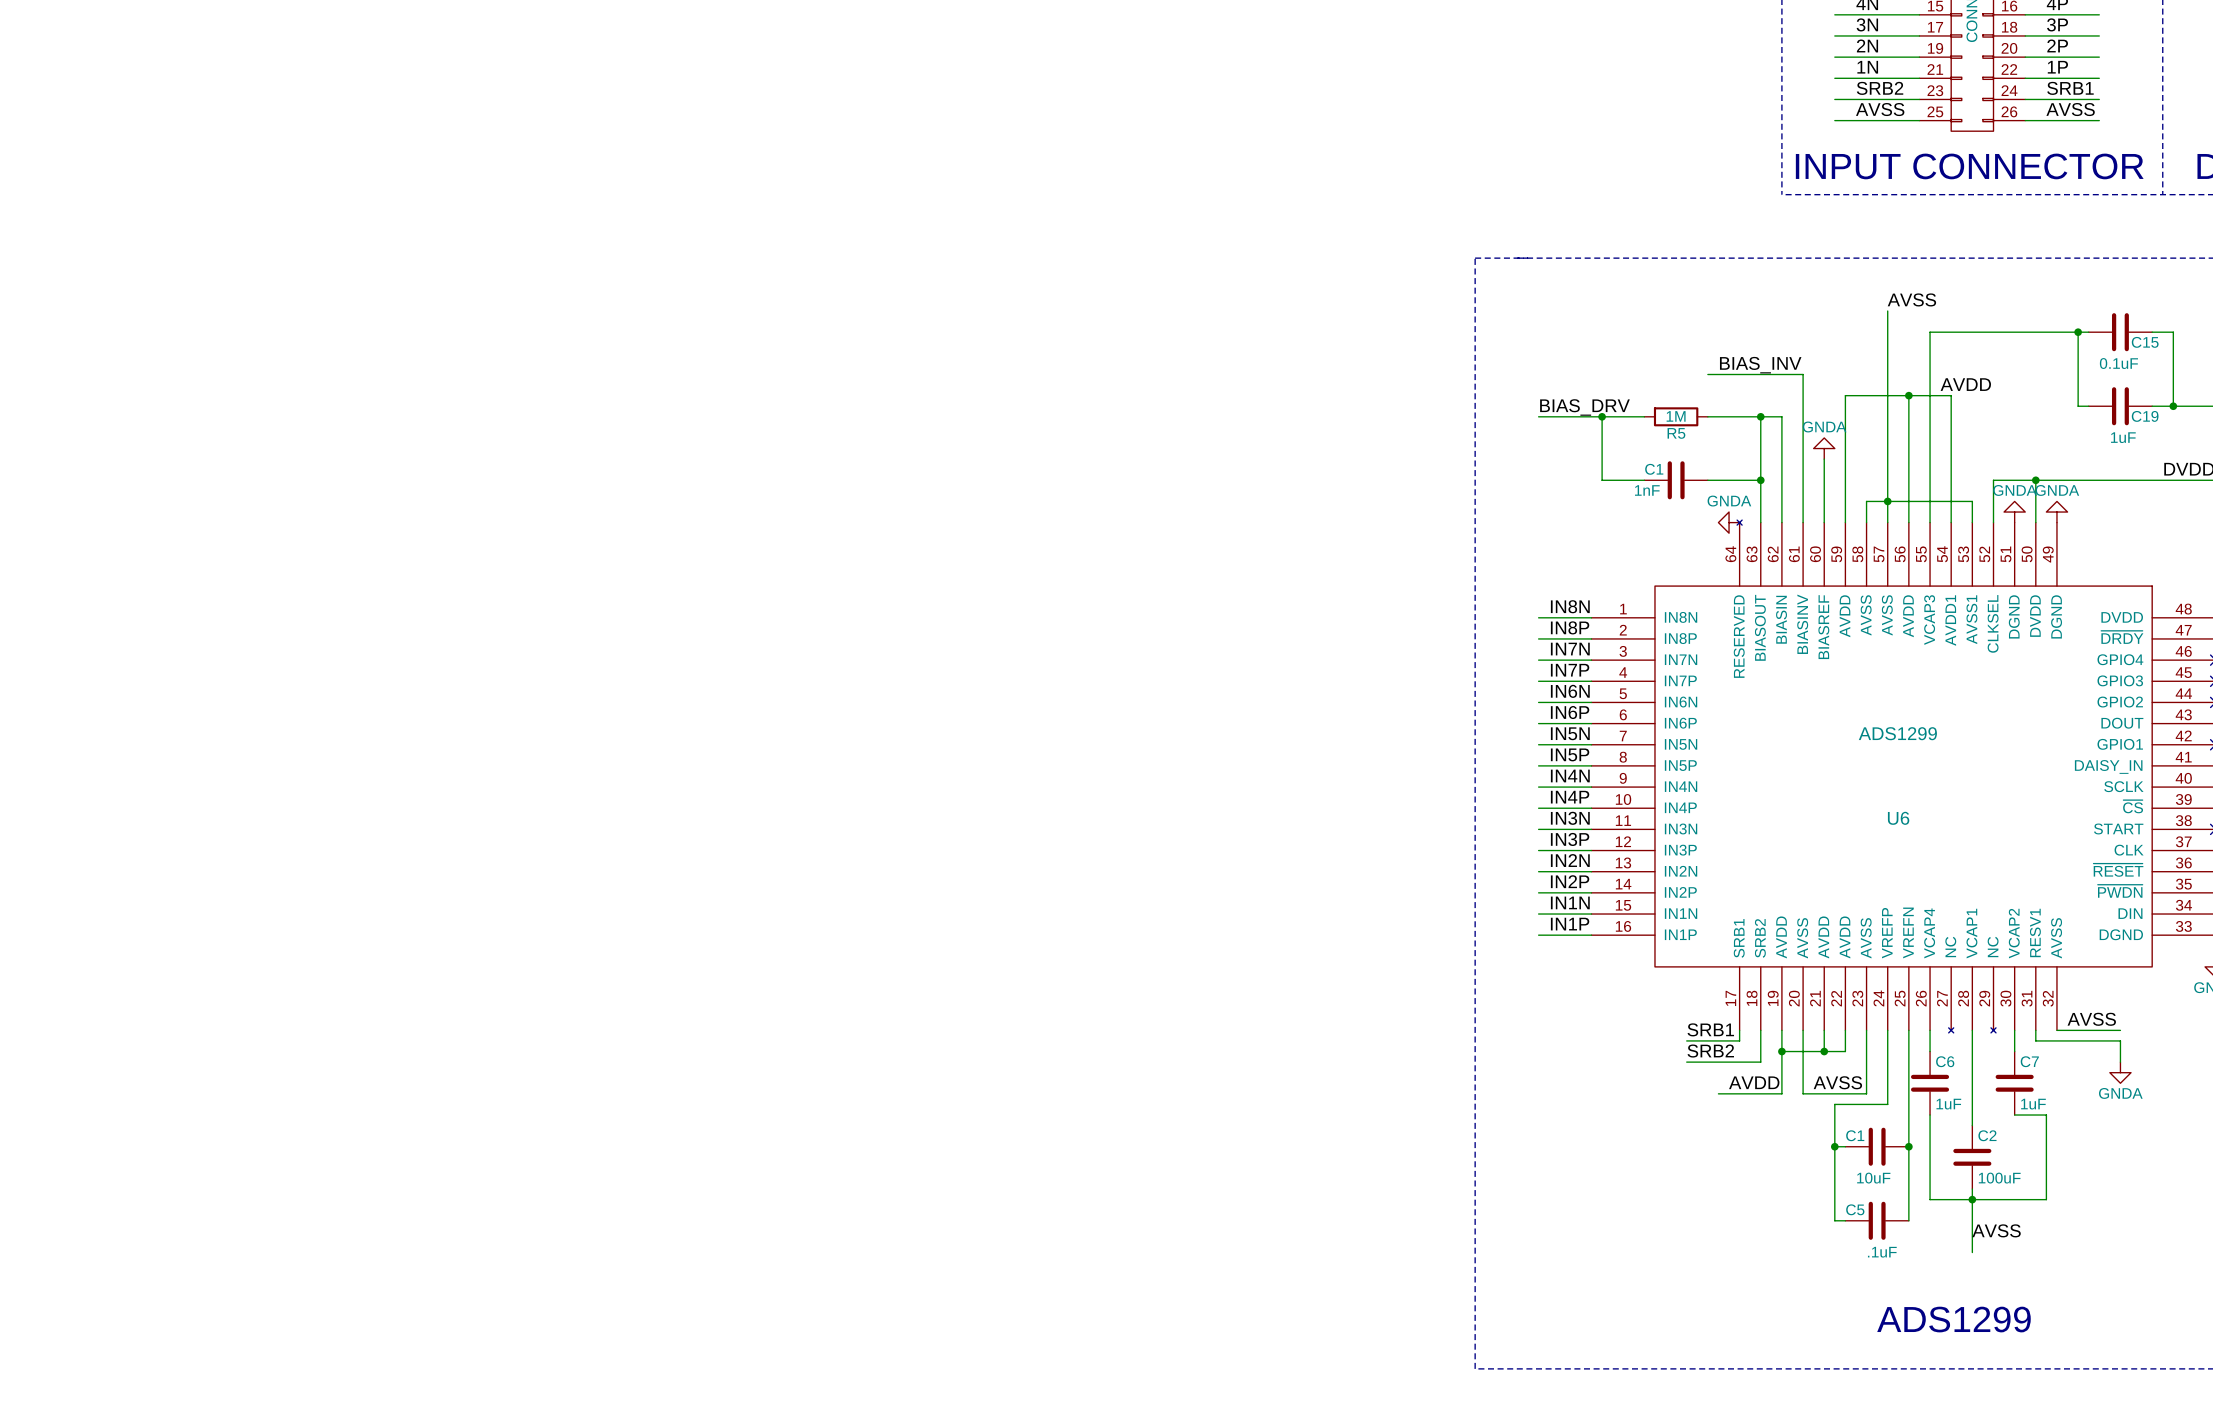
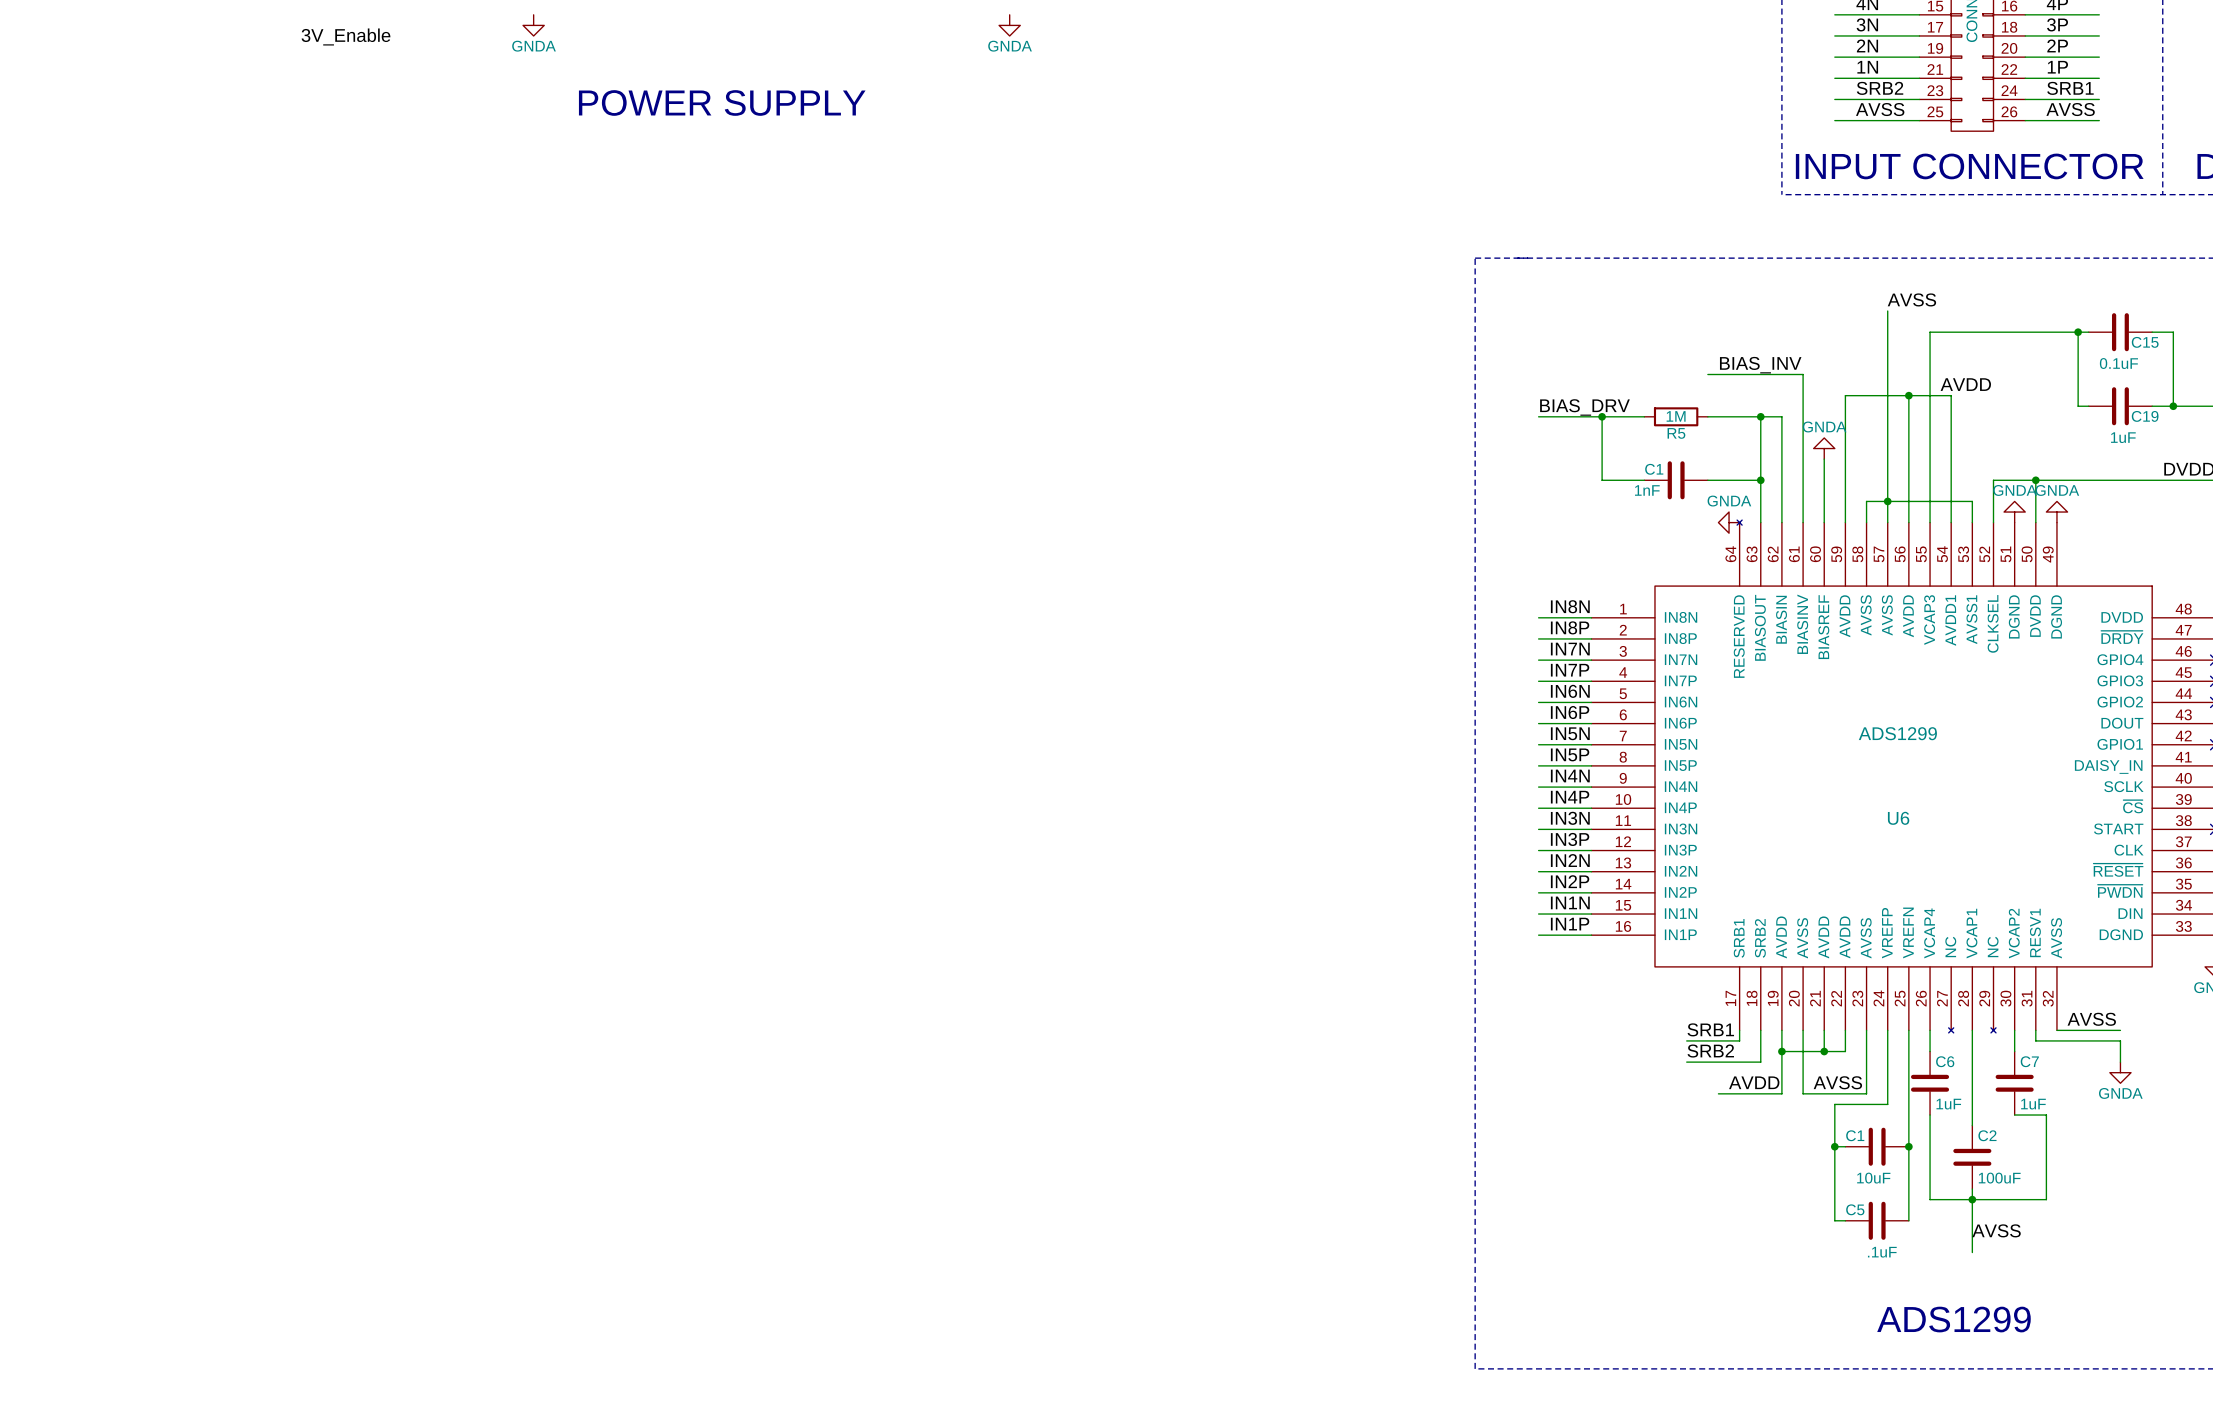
power symbol: none -> GNDA (533, 25)
power symbol: none -> GNDA (1009, 25)
label: none -> 3V_Enable (346, 36)
text: none -> POWER SUPPLY (722, 102)

